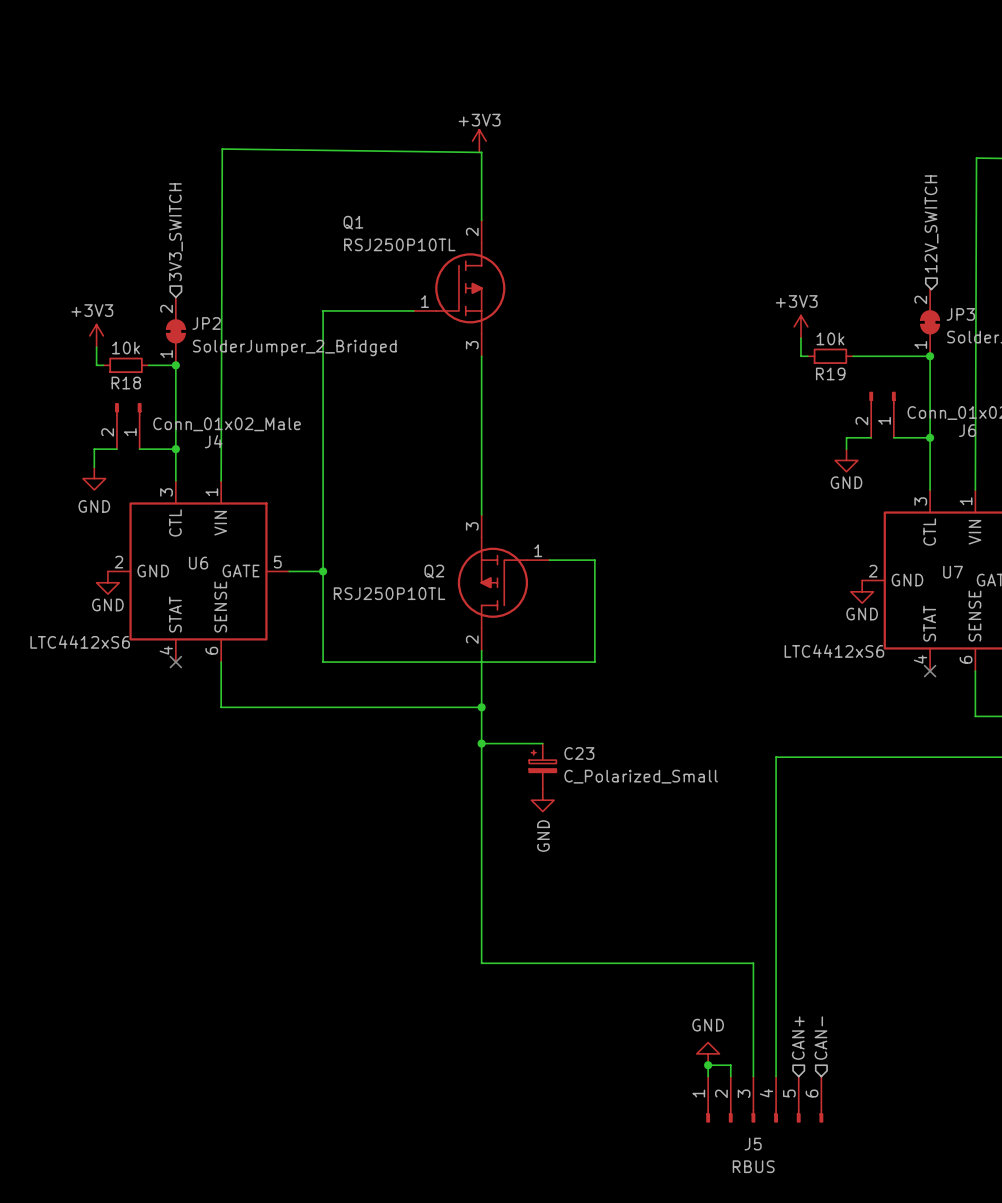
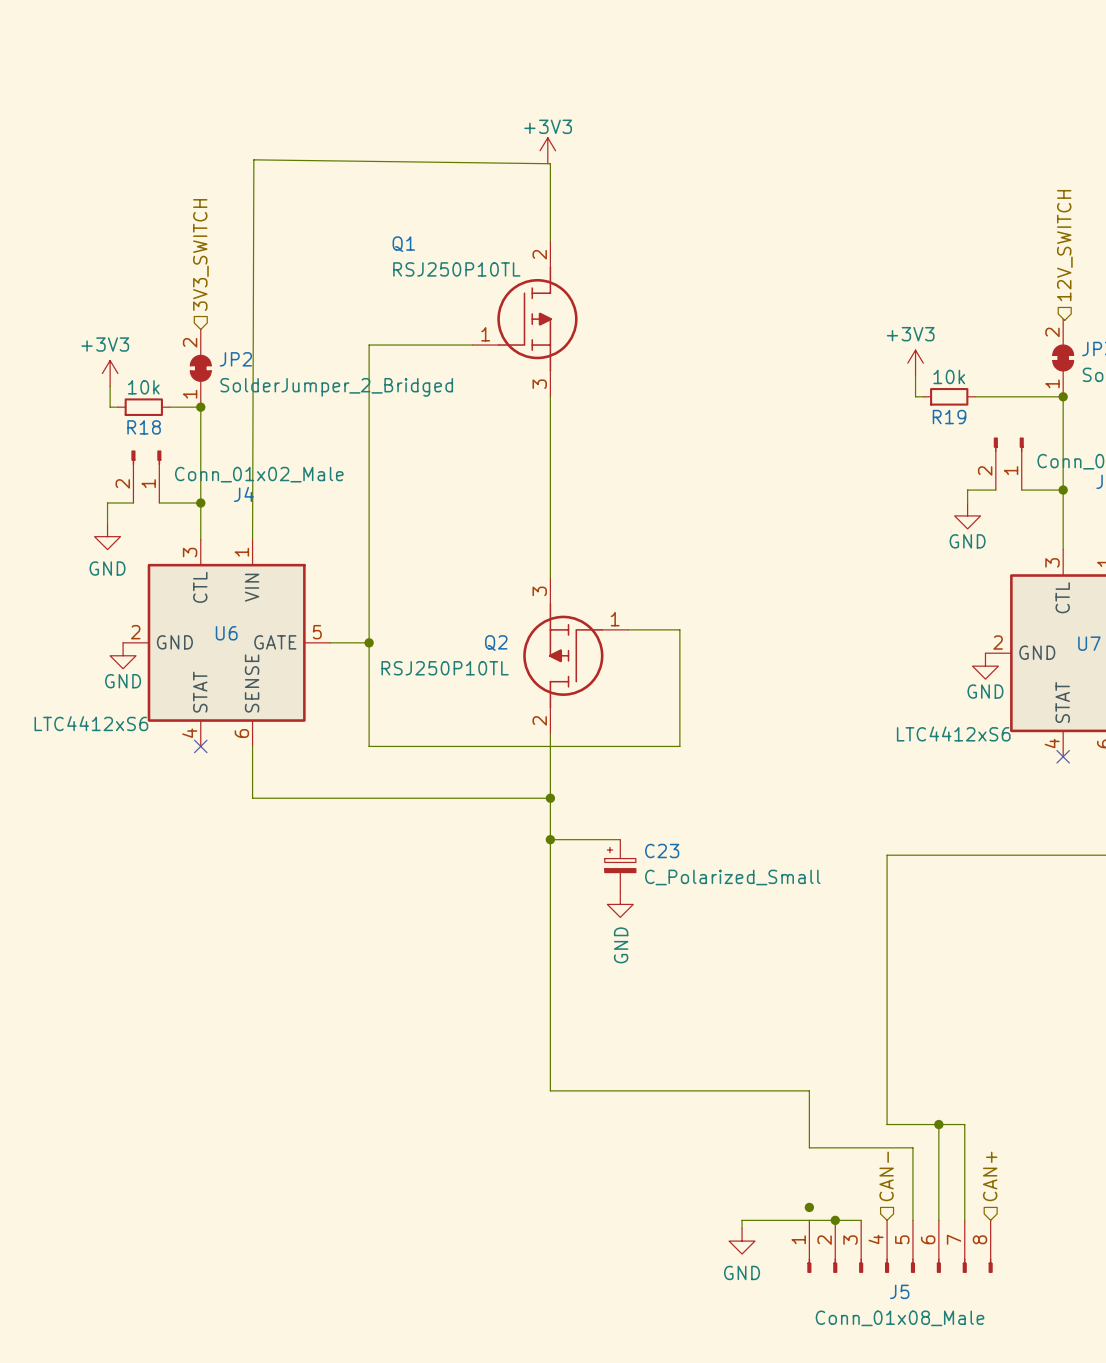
wire: (708, 963) (753, 963) (753, 1076) -> (809, 1090) (809, 1147) (912, 1147) (912, 1220)
wire: (776, 992) (776, 1076) -> (887, 1124) (964, 1124) (964, 1220)
wire: none -> (938, 1124) (938, 1220)
junction: none -> (938, 1124)
hierarchical label position: CAN+ (798, 1038) -> CAN+ (990, 1176)
hierarchical label position: CAN- (820, 1038) -> CAN- (886, 1176)
power symbol rotation: 0° (708, 1053) -> 180° (742, 1241)
power symbol position: GND (708, 1053) -> GND (742, 1241)
J5 symbol: [706, 1076, 824, 1123] -> [807, 1220, 993, 1273]
wire: (708, 1076) (708, 1065) (730, 1065) (730, 1076) -> none
junction: none -> (835, 1220)
wire: none -> (861, 1220) (742, 1220) (742, 1228)
J5 value: RBUS (753, 1166) -> Conn_01x08_Male (900, 1318)

